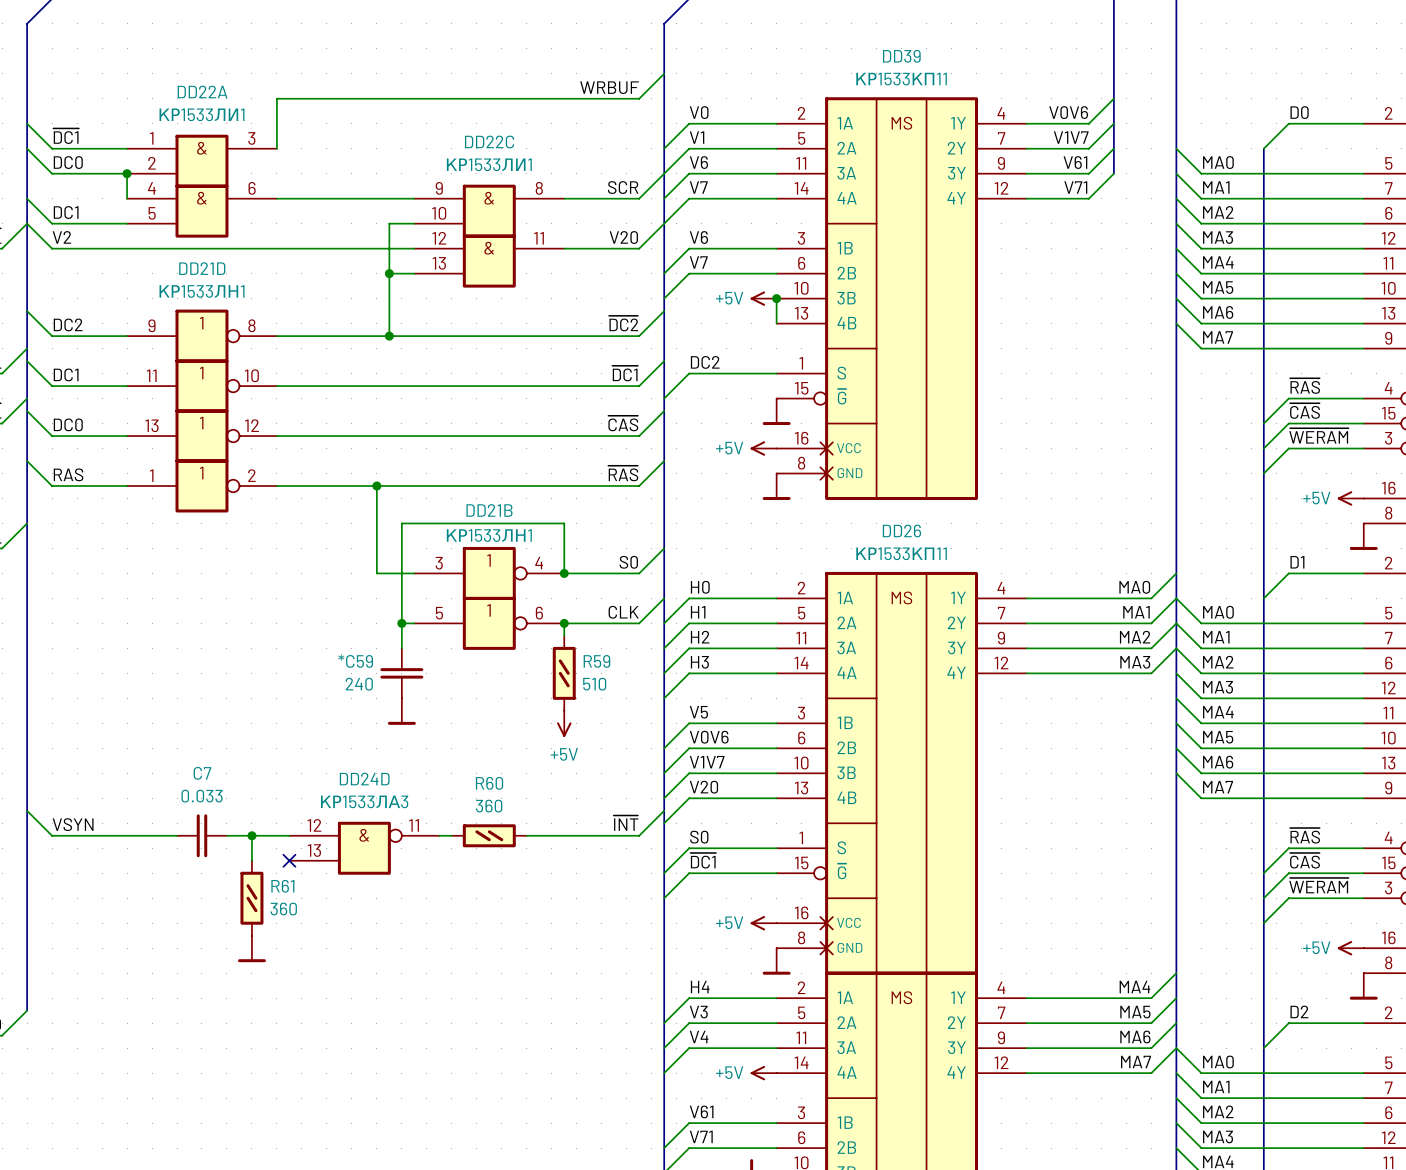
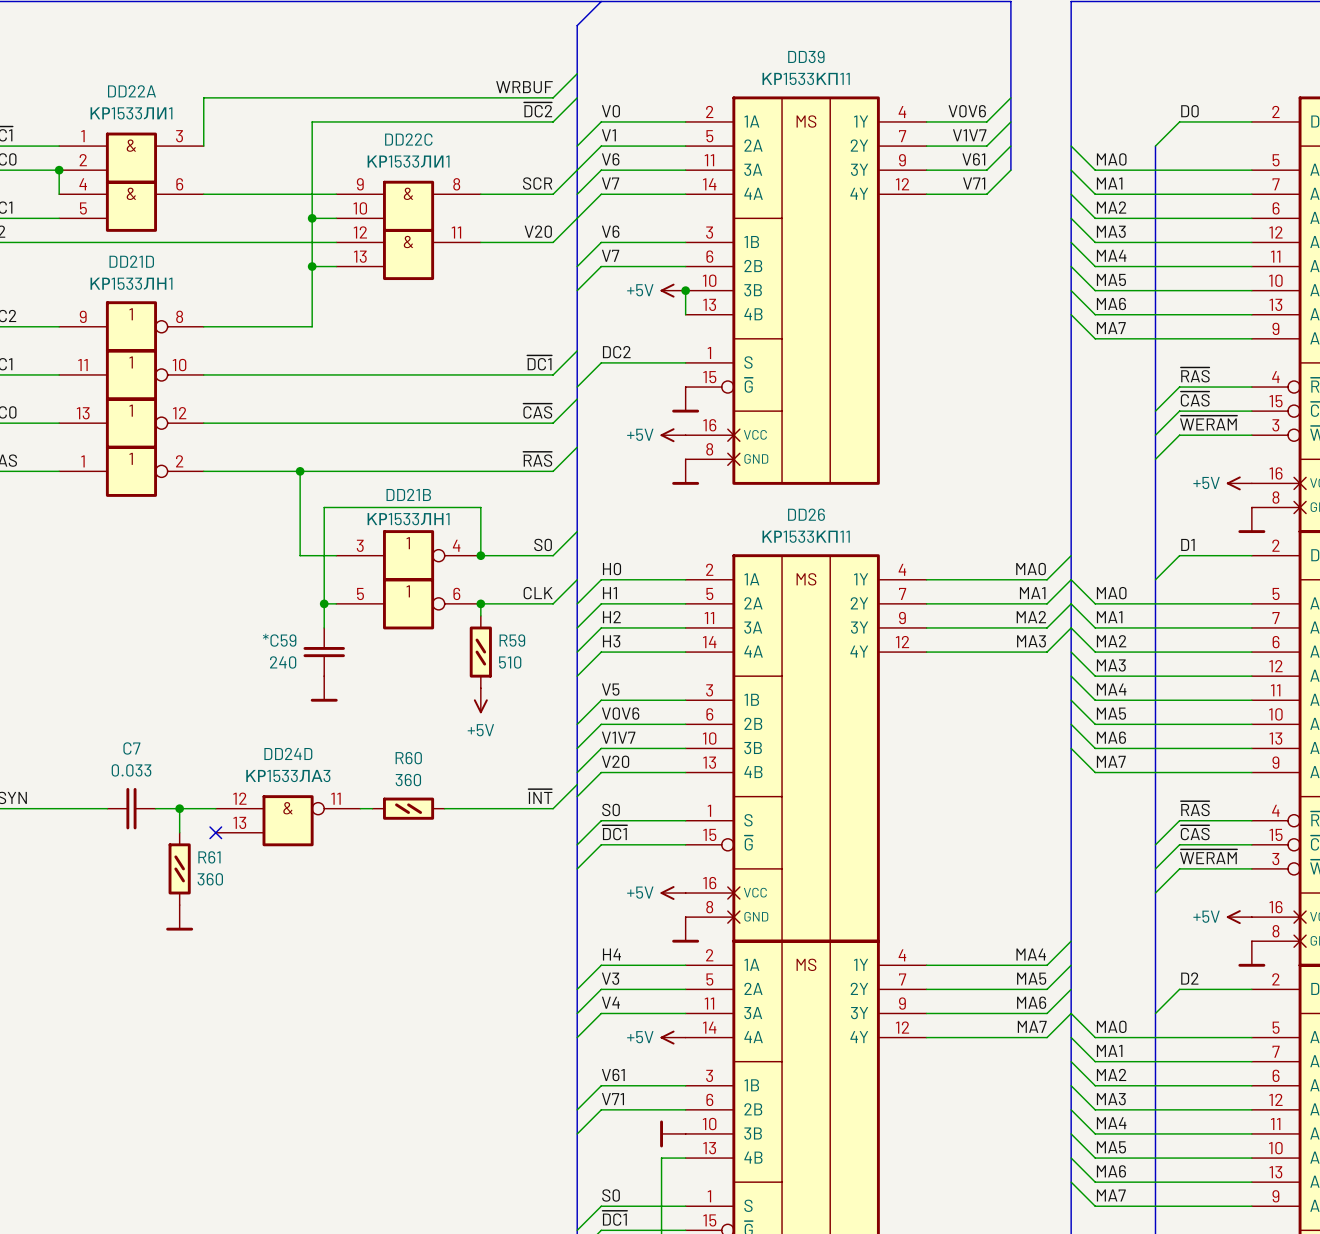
wire: none -> (577, 97) (553, 121) (312, 121) (312, 218)
junction: none -> (312, 218)
wire: (664, 311) (639, 336) (389, 336) -> none
label position: ~{DC2} (623, 323) -> ~{DC2} (538, 109)
junction: (389, 336) -> none

